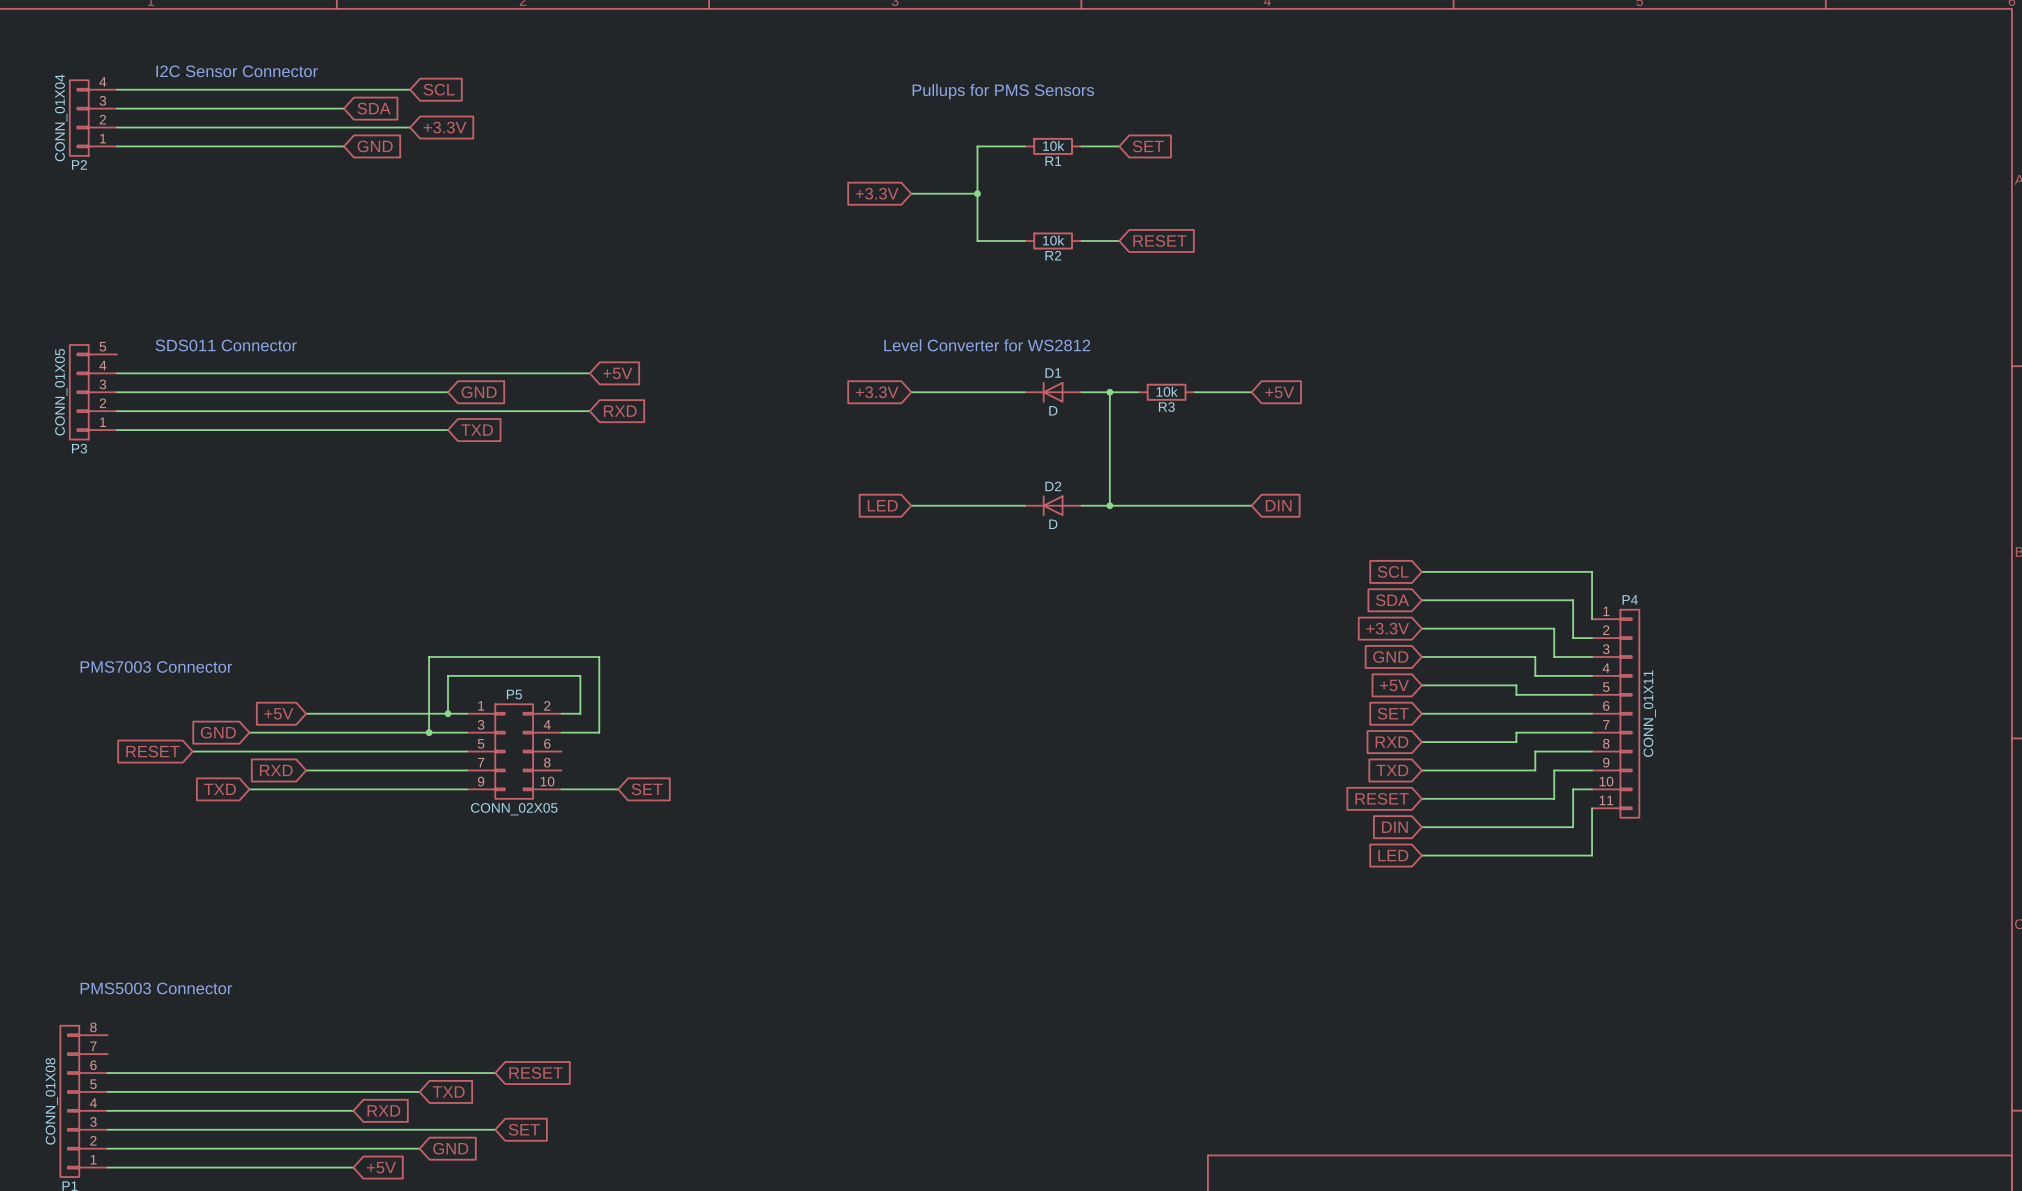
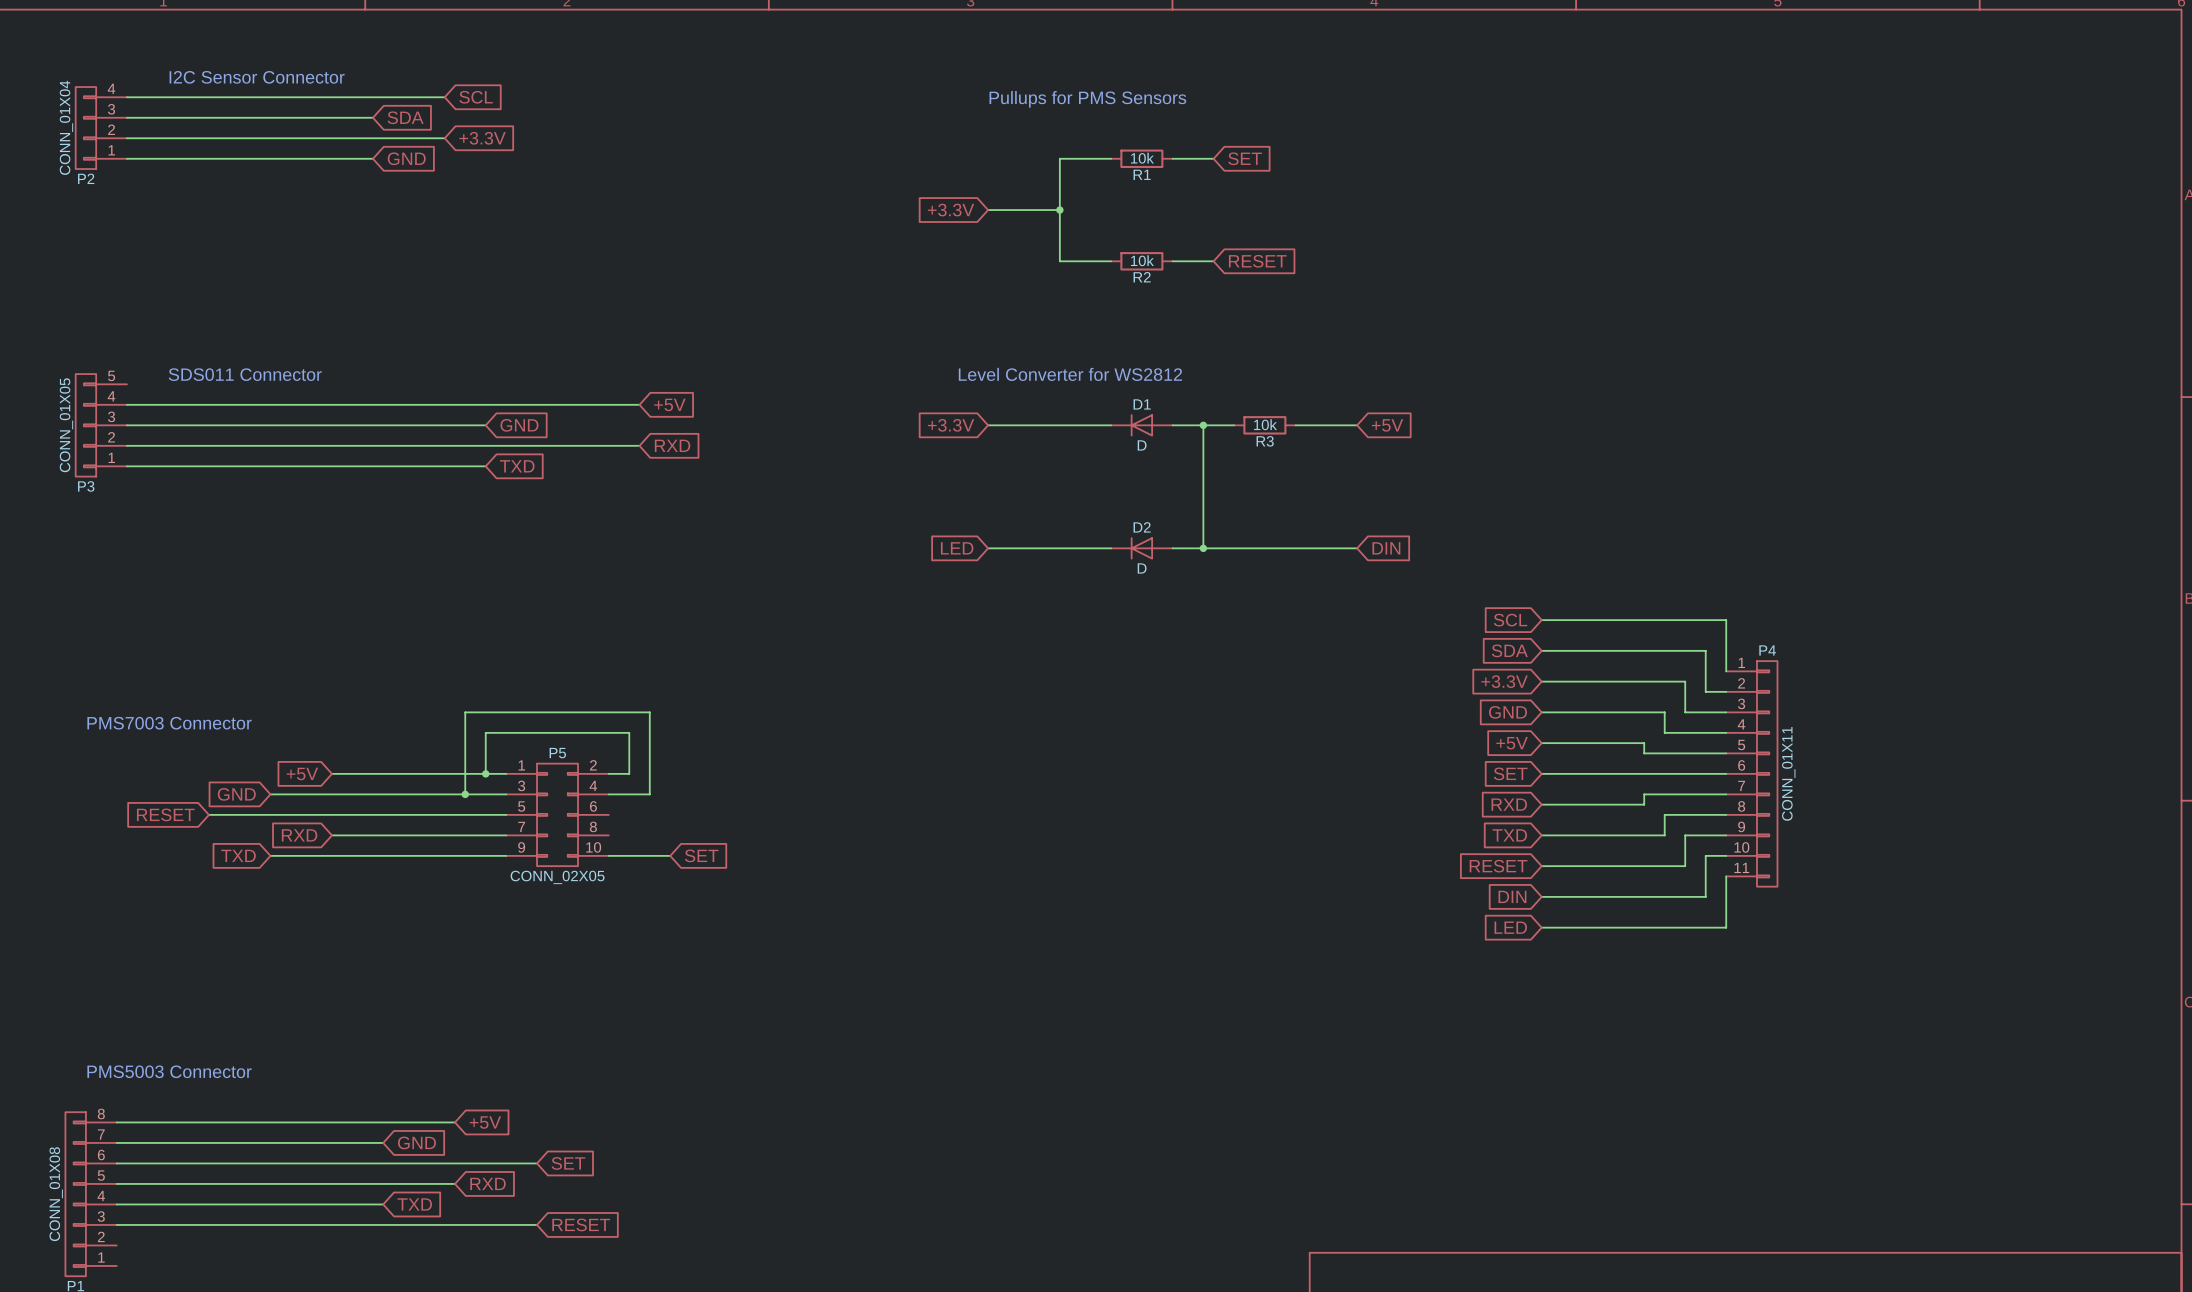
global label: RESET (536, 1073) -> SET (568, 1163)
global label: TXD (448, 1091) -> RXD (488, 1183)
global label: RXD (383, 1110) -> TXD (414, 1204)
global label: SET (524, 1129) -> RESET (581, 1224)
wire: (107, 1148) (419, 1148) -> (116, 1122) (455, 1122)
global label position: GND (450, 1148) -> GND (416, 1142)
wire: (107, 1167) (353, 1167) -> (116, 1142) (383, 1142)
global label position: +5V (381, 1167) -> +5V (485, 1122)

